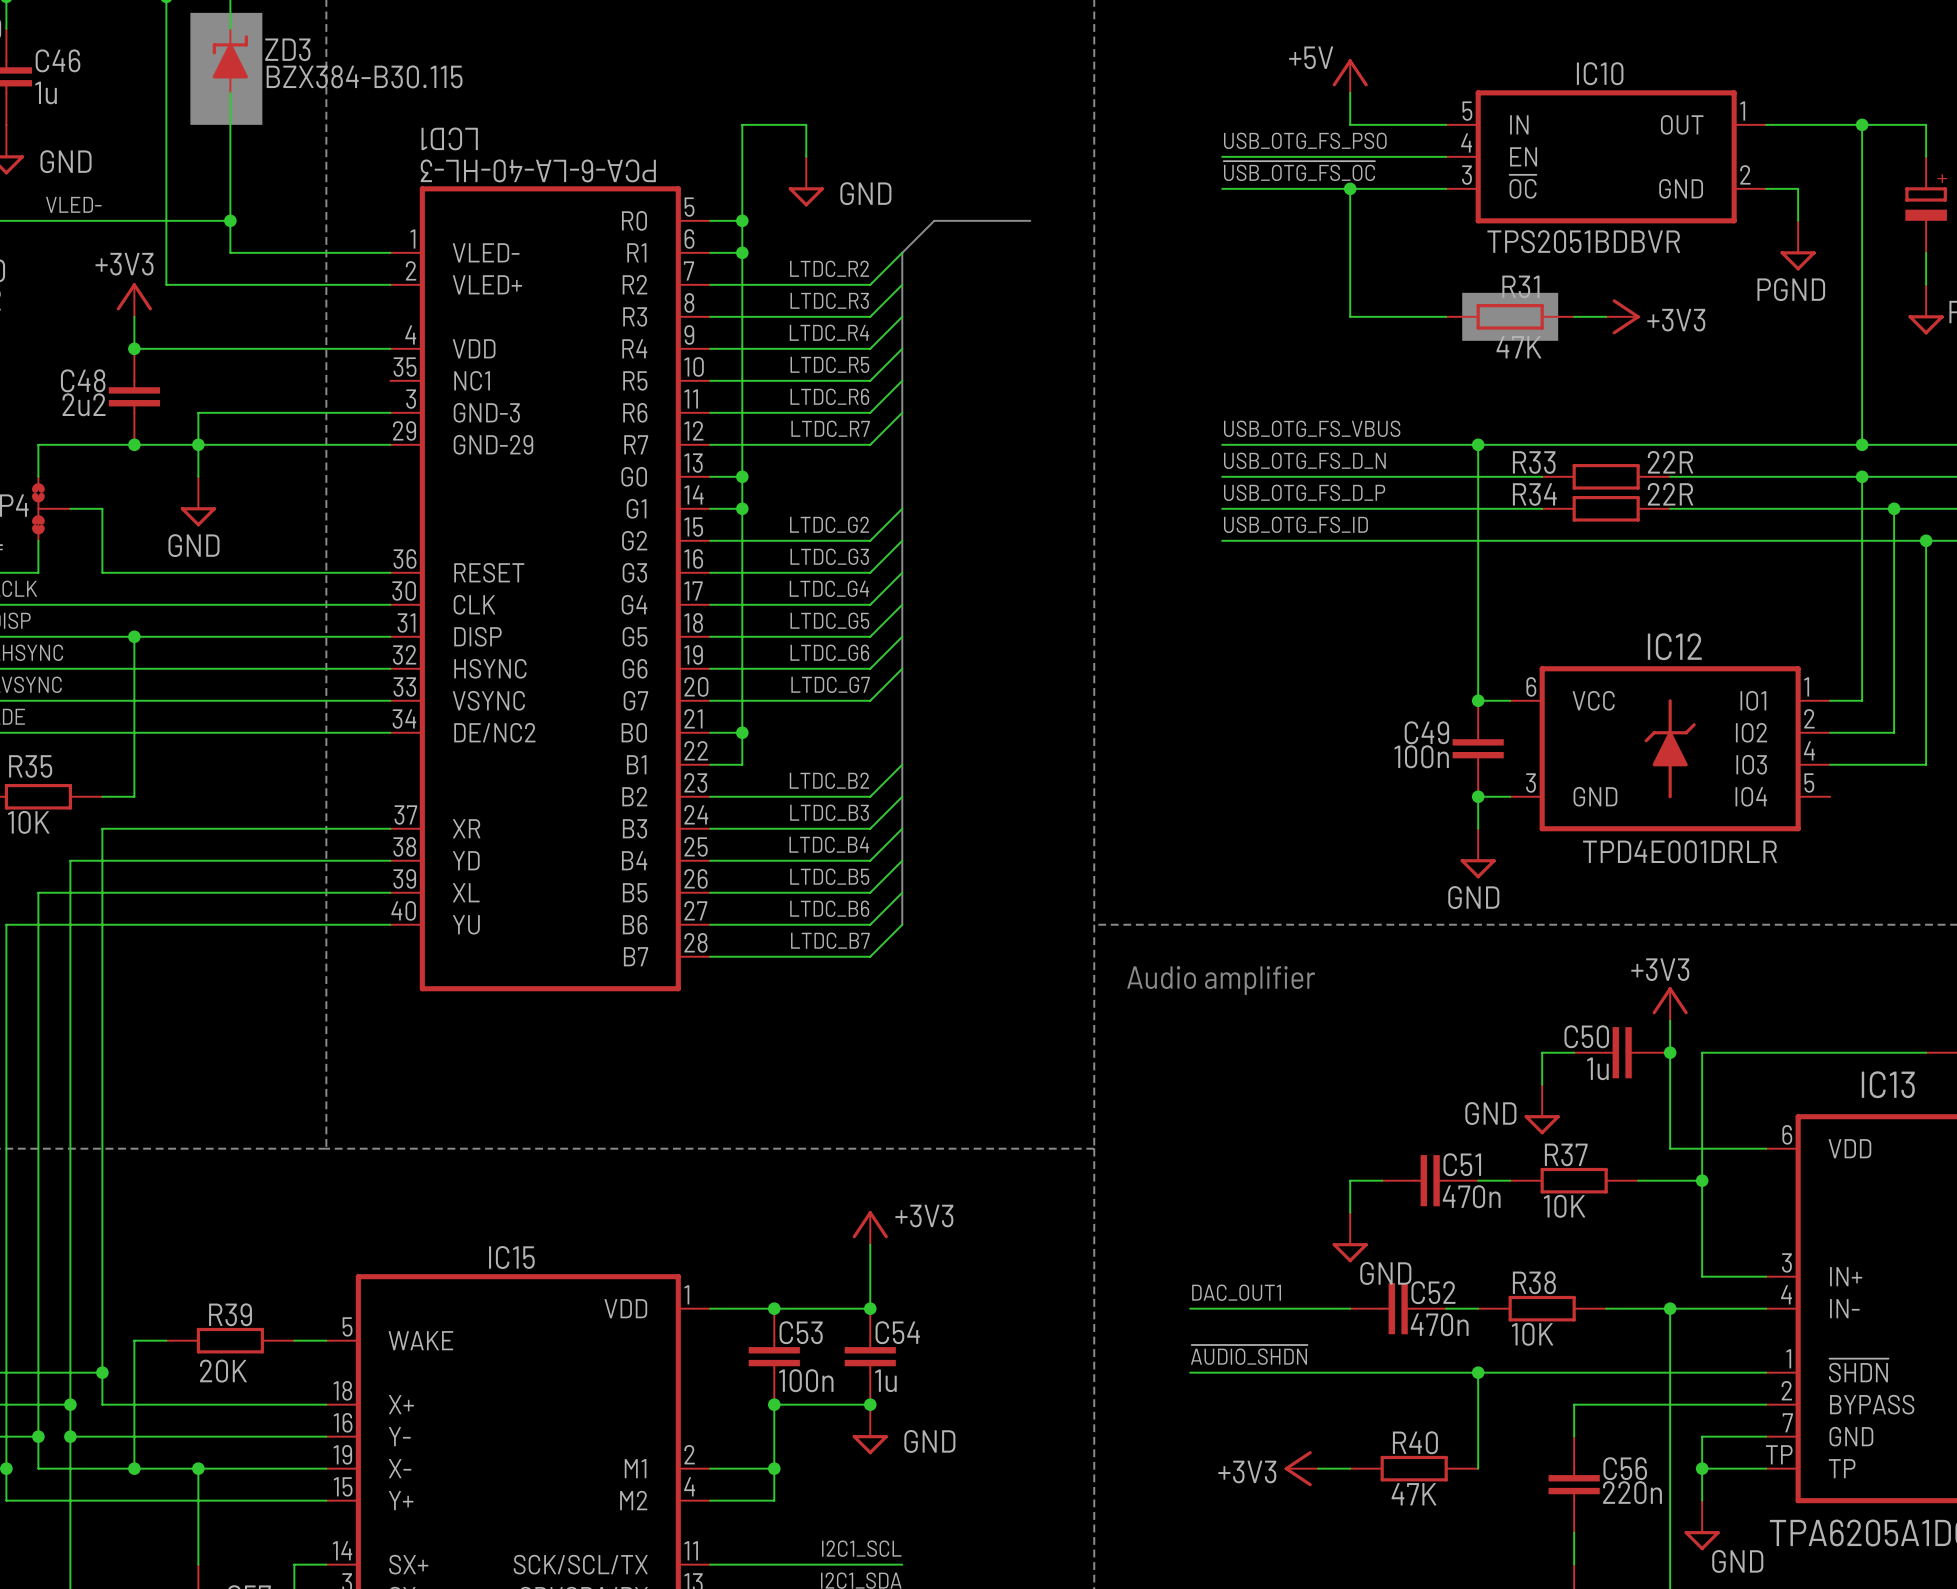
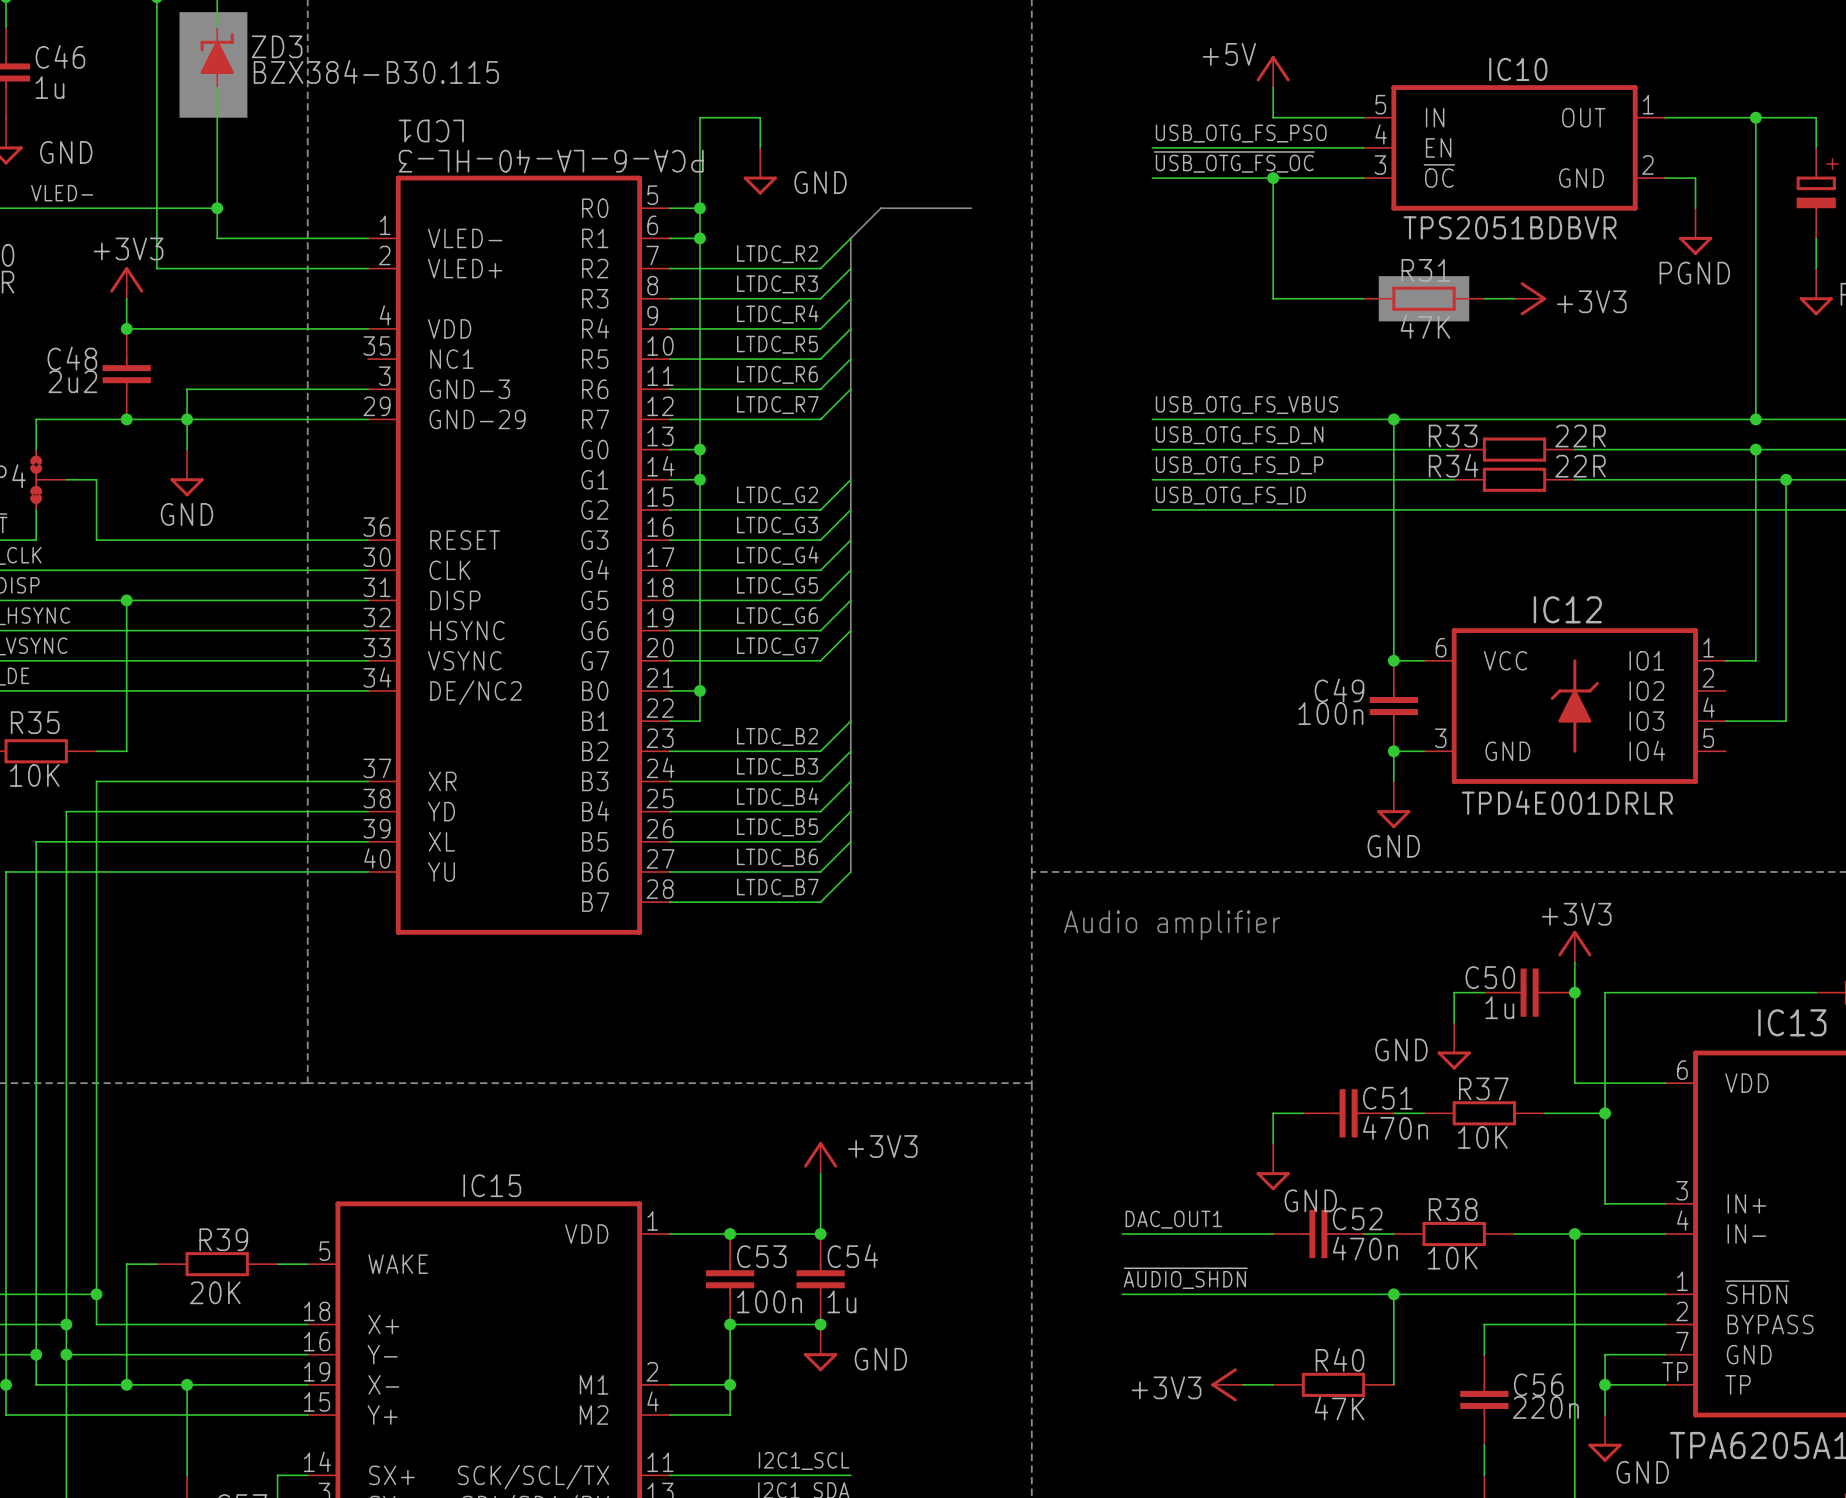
wire: (1926, 540) (1926, 764) (1894, 764) -> none
junction: (1926, 540) -> none
wire: (1830, 732) (1894, 732) -> (1786, 721) (1786, 690)

